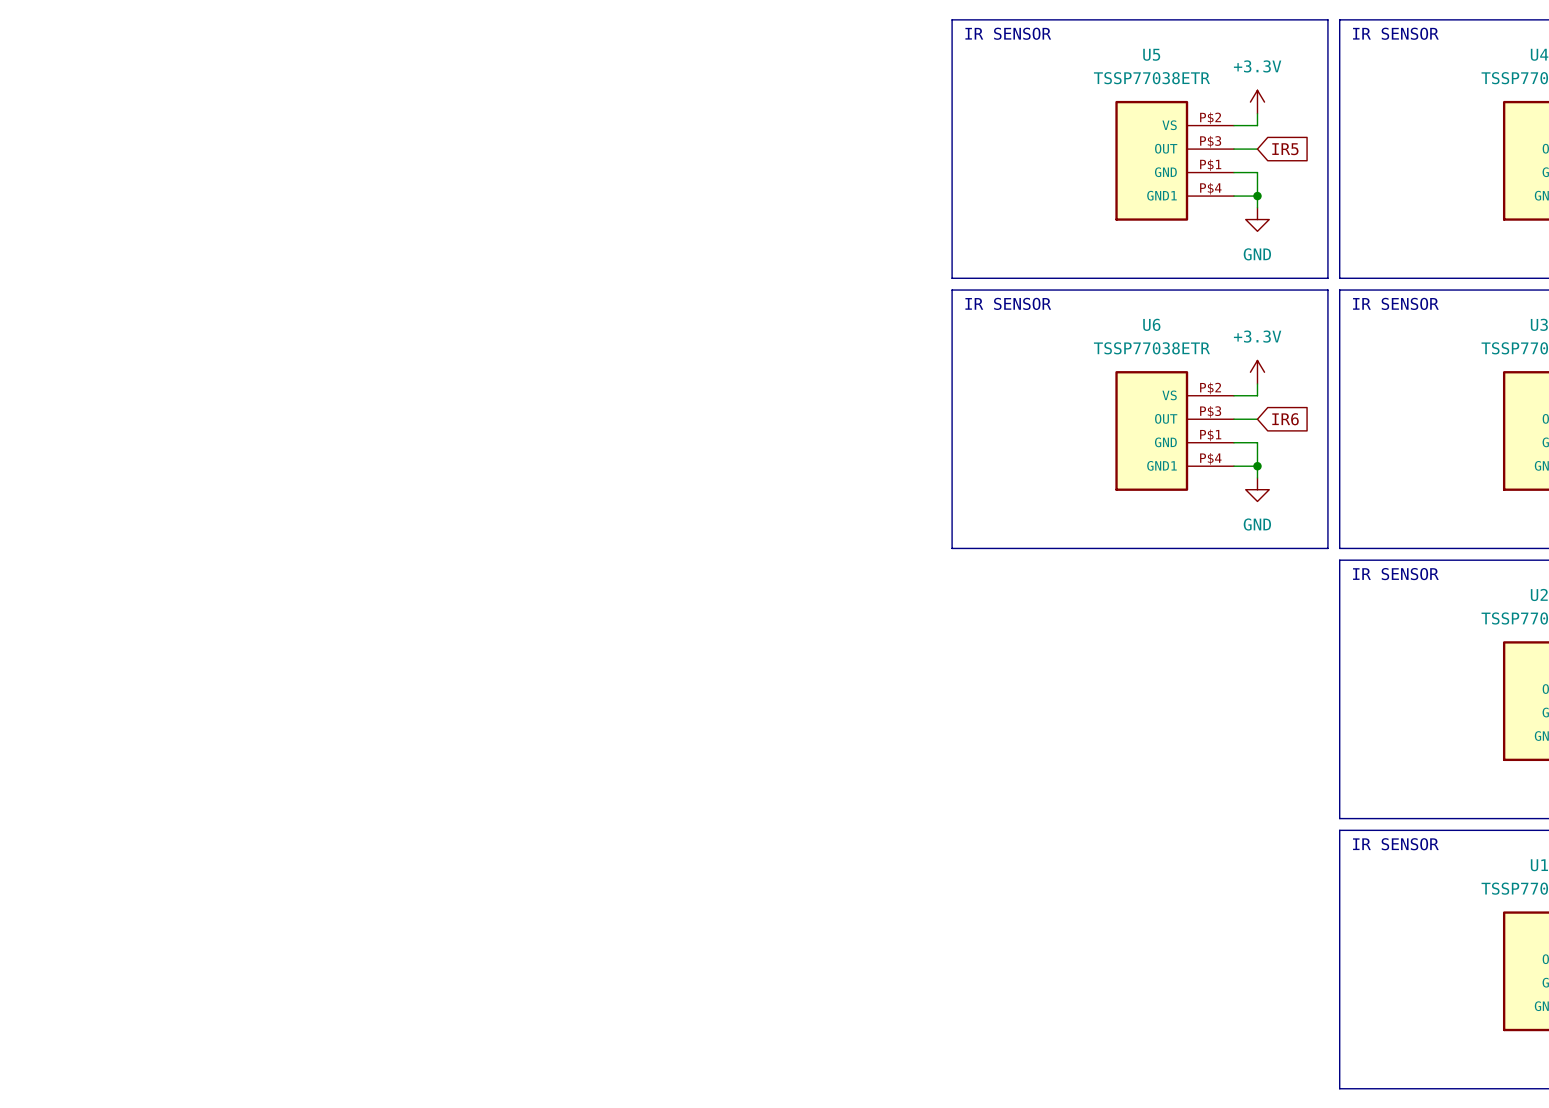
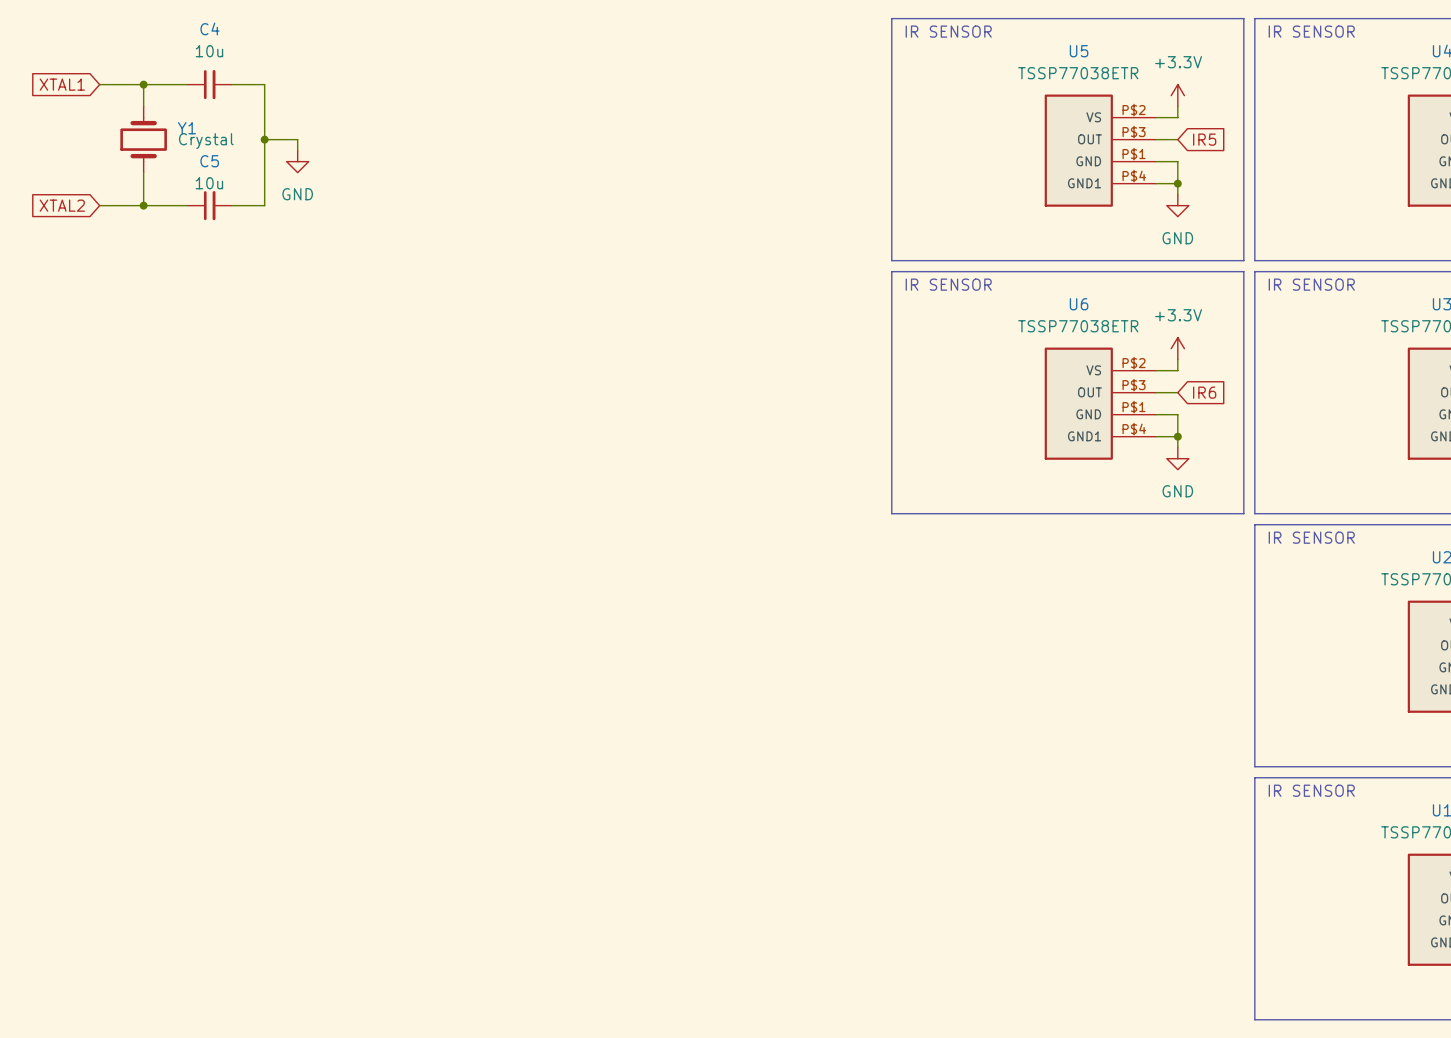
global label: none -> XTAL1 (62, 84)
wire: none -> (99, 84) (187, 84)
wire: none -> (143, 84) (143, 106)
junction: none -> (143, 84)
C4: none -> 10u (209, 84)
wire: none -> (231, 84) (264, 84) (264, 205) (231, 205)
Y1: none -> Crystal (143, 139)
wire: none -> (264, 139) (297, 139) (297, 150)
junction: none -> (264, 139)
power symbol: none -> GND (297, 161)
wire: none -> (143, 172) (143, 205)
global label: none -> XTAL2 (62, 205)
wire: none -> (99, 205) (187, 205)
junction: none -> (143, 205)
C5: none -> 10u (209, 205)

